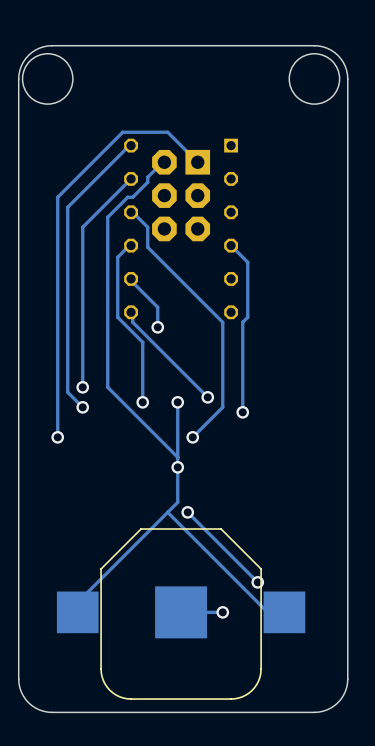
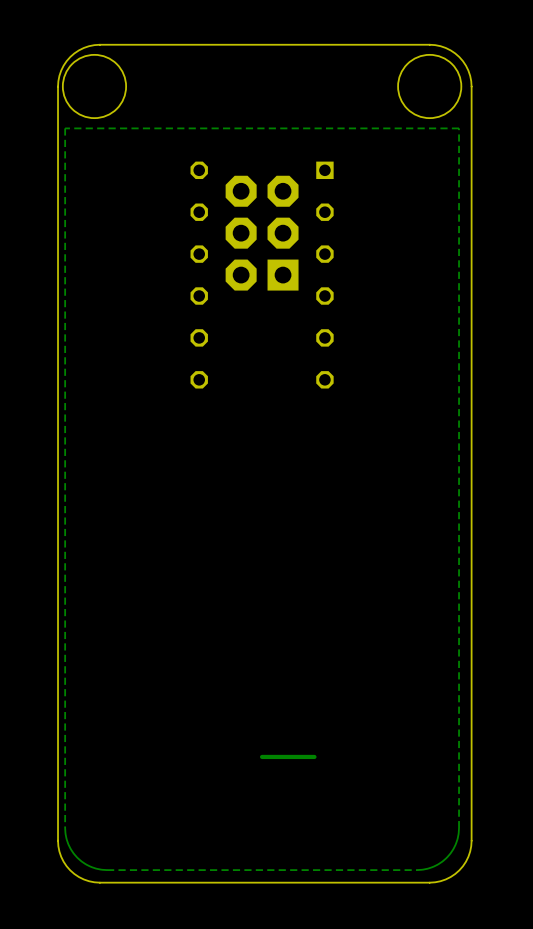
zone outline: none -> (459, 128) (65, 128) (65, 828) (70, 849) (86, 864) (107, 870) (417, 870) (438, 864) (453, 849) (459, 828) (459, 128)
track: (131, 145) (67, 207) (67, 392) (82, 407) -> none
track: (164, 162) (147, 177) (147, 182) (132, 197) (127, 197) (107, 217) (107, 387) (177, 457) -> none
track: (197, 162) (167, 132) (122, 132) (57, 197) (57, 437) -> none
track: (131, 178) (82, 227) (82, 387) -> none
part side: top (181, 195) -> bottom (262, 233)
track: (131, 212) (147, 227) (147, 247) (222, 322) (222, 407) (192, 437) -> none
track: (131, 245) (117, 257) (117, 317) (142, 342) (142, 402) -> none
track: (231, 245) (247, 262) (247, 317) (242, 322) (242, 412) -> none
track: (131, 278) (157, 307) (157, 327) -> none
track: (131, 312) (132, 312) (132, 322) (207, 397) -> none
via: (157, 327) -> none
via: (82, 387) -> none
via: (207, 397) -> none
via: (142, 402) -> none
track: (177, 402) (177, 502) (77, 602) (77, 612) -> none
via: (177, 402) -> none
via: (82, 407) -> none
via: (242, 412) -> none
via: (57, 437) -> none
via: (192, 437) -> none
via: (177, 467) -> none
track: (167, 512) (267, 612) (284, 612) -> none
track: (187, 512) (257, 582) -> none
via: (187, 512) -> none
via: (257, 582) -> none
via: (222, 612) -> none
part: (181, 614) -> none

